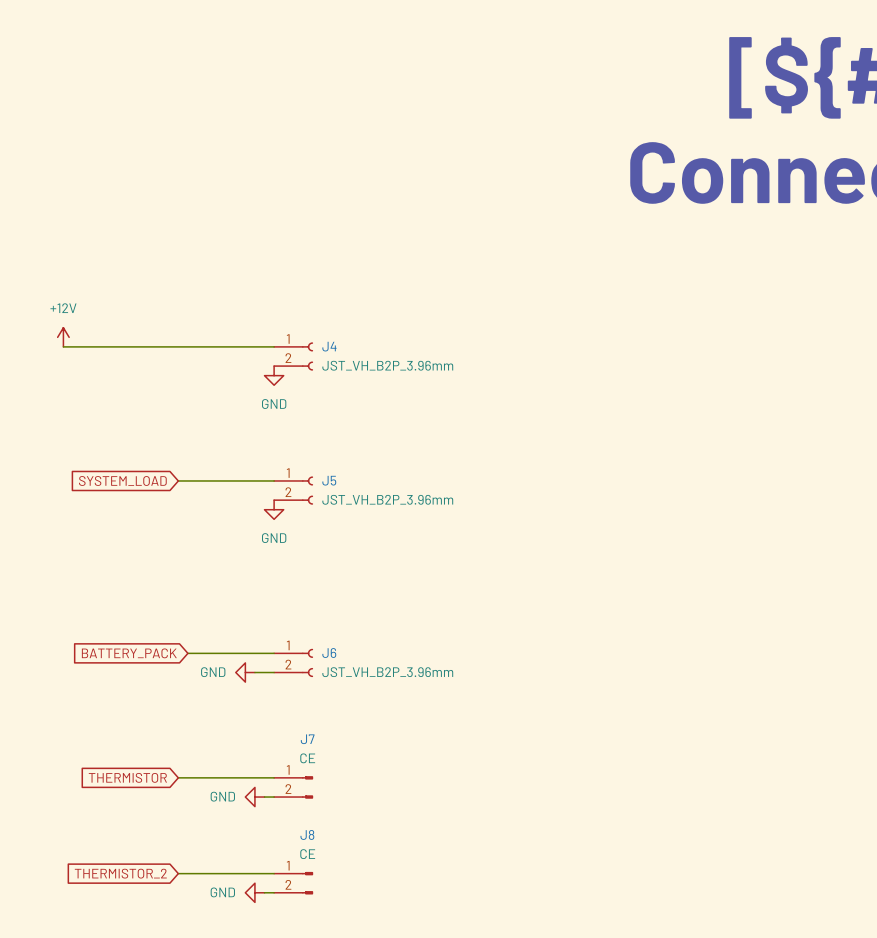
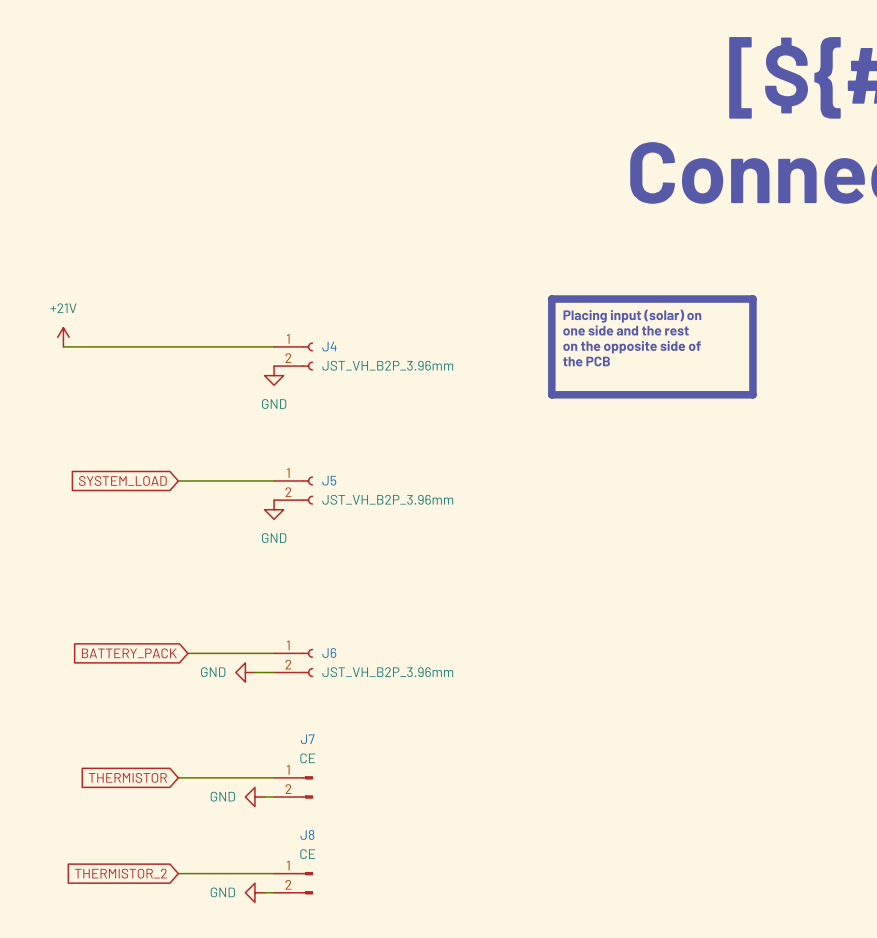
line: none -> (551, 299) (752, 299) (752, 394) (551, 394) (551, 299)
text: none -> Placing input (solar) on (632, 316)
text: none -> one side and the rest (626, 330)
power symbol: +12V (63, 337) -> +21V (63, 337)
text: none -> on the opposite side of (632, 347)
text: none -> the PCB (586, 361)

